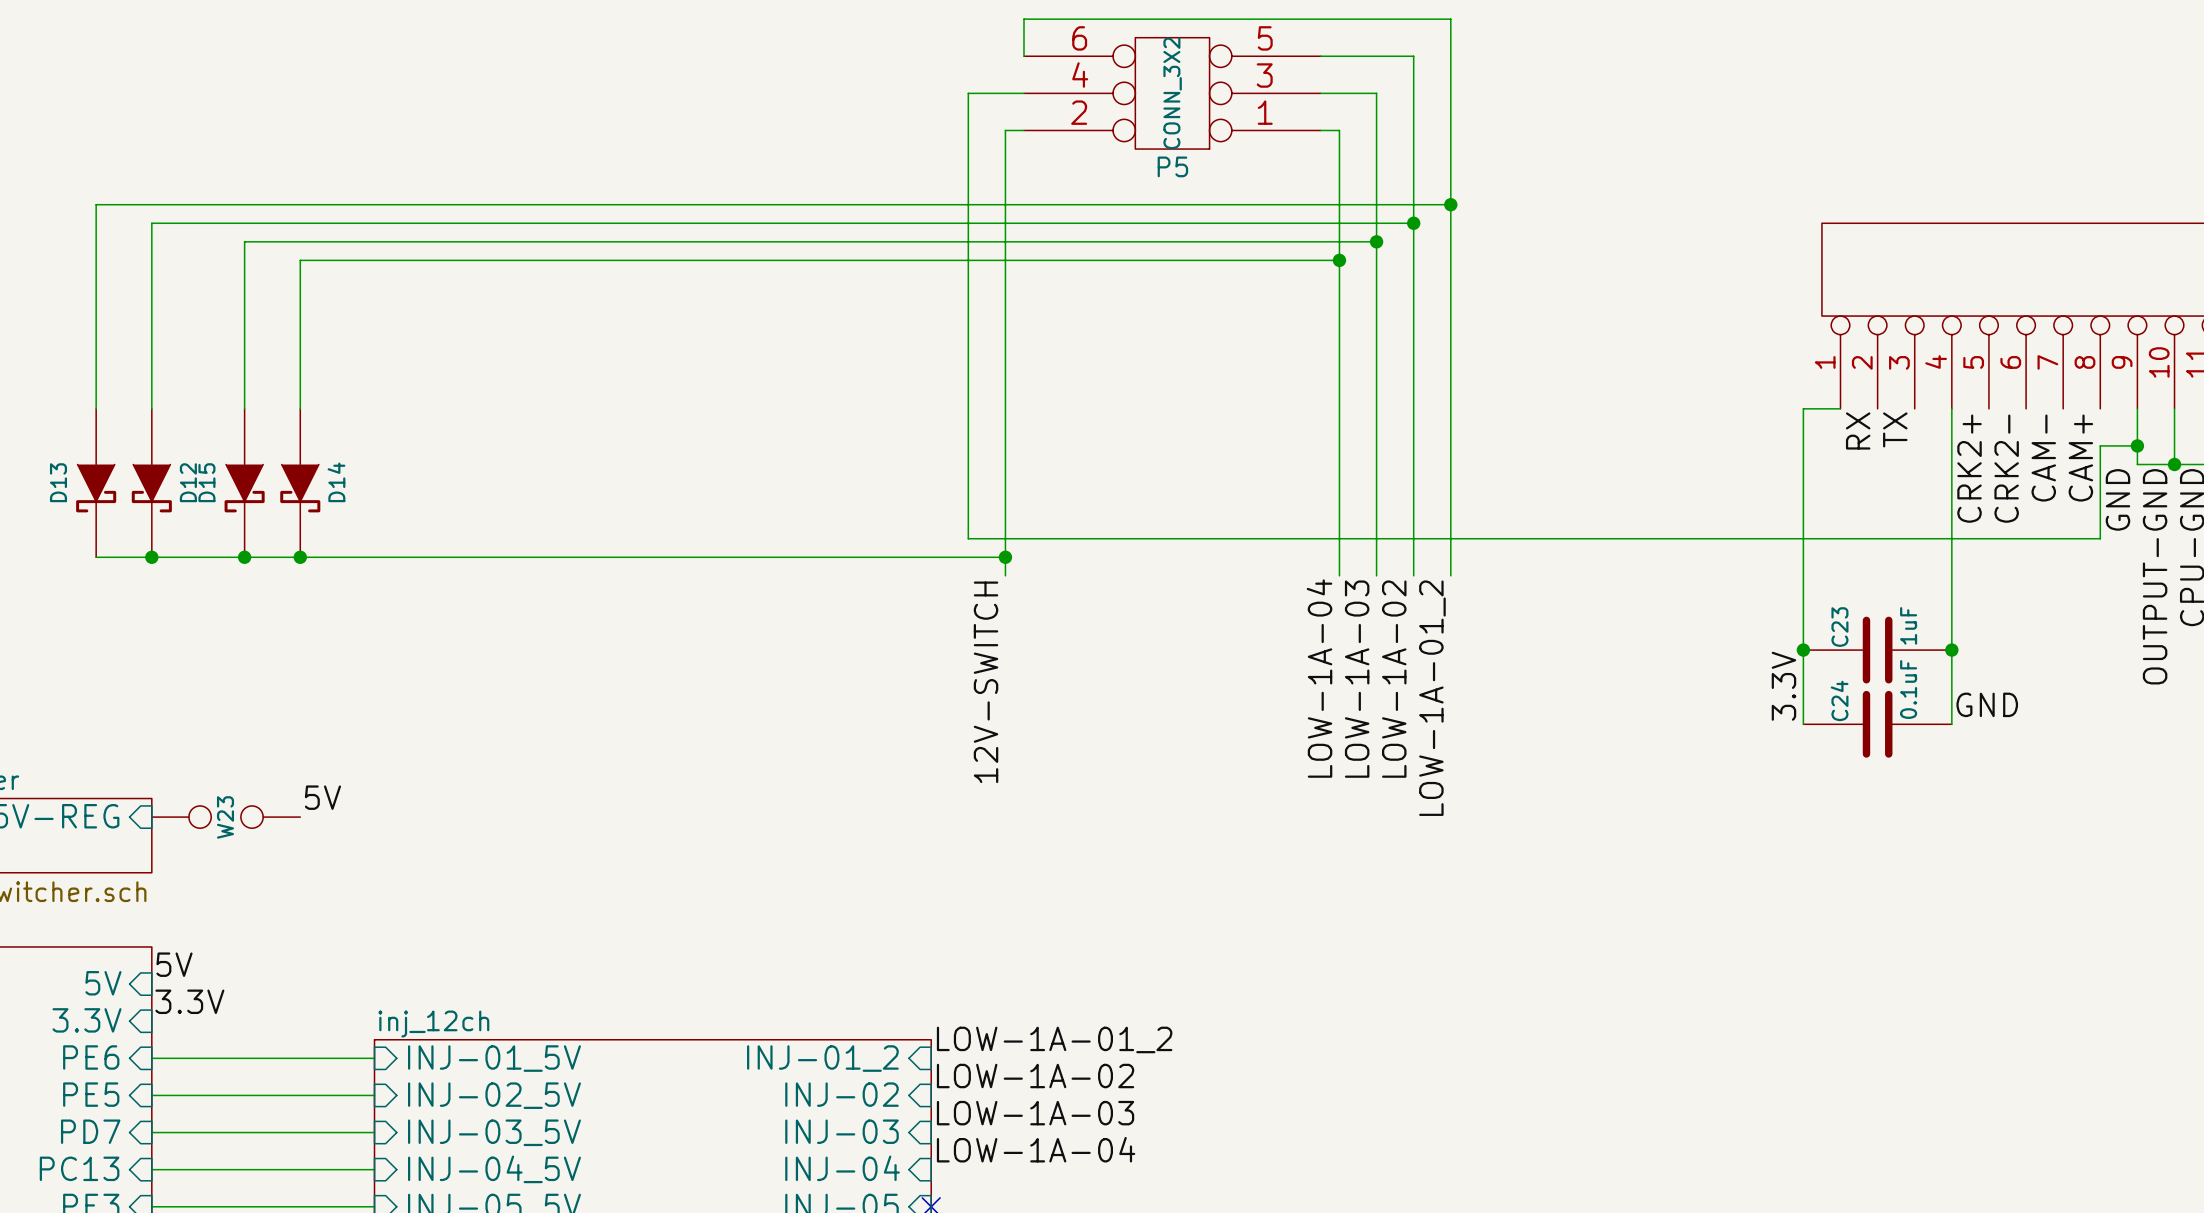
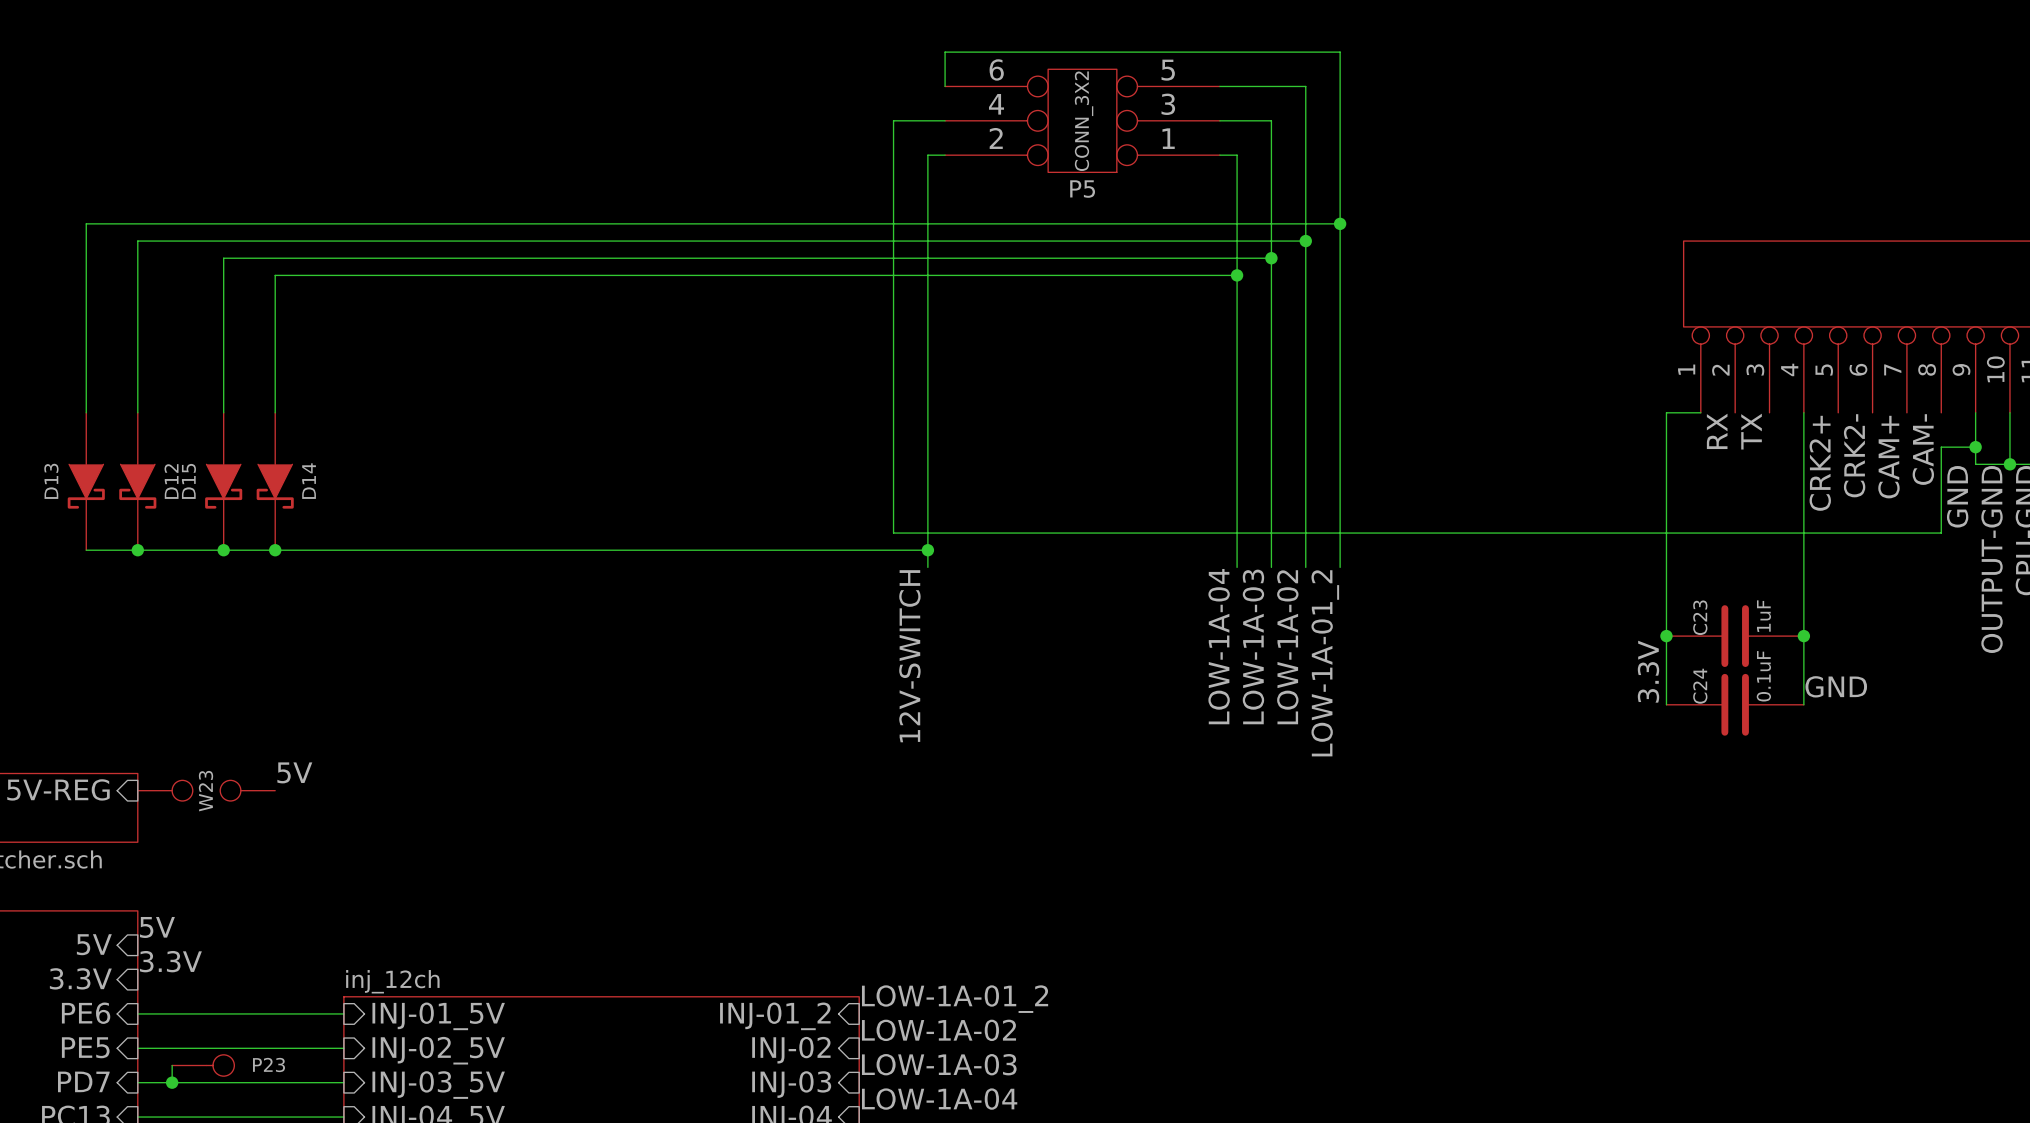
label: CAM- (2043, 458) -> CAM+ (1888, 457)
label: CAM+ (2080, 458) -> CAM- (1923, 449)
wire: none -> (172, 1065) (172, 1082)
P23: none -> (203, 1065)
junction: none -> (172, 1082)

